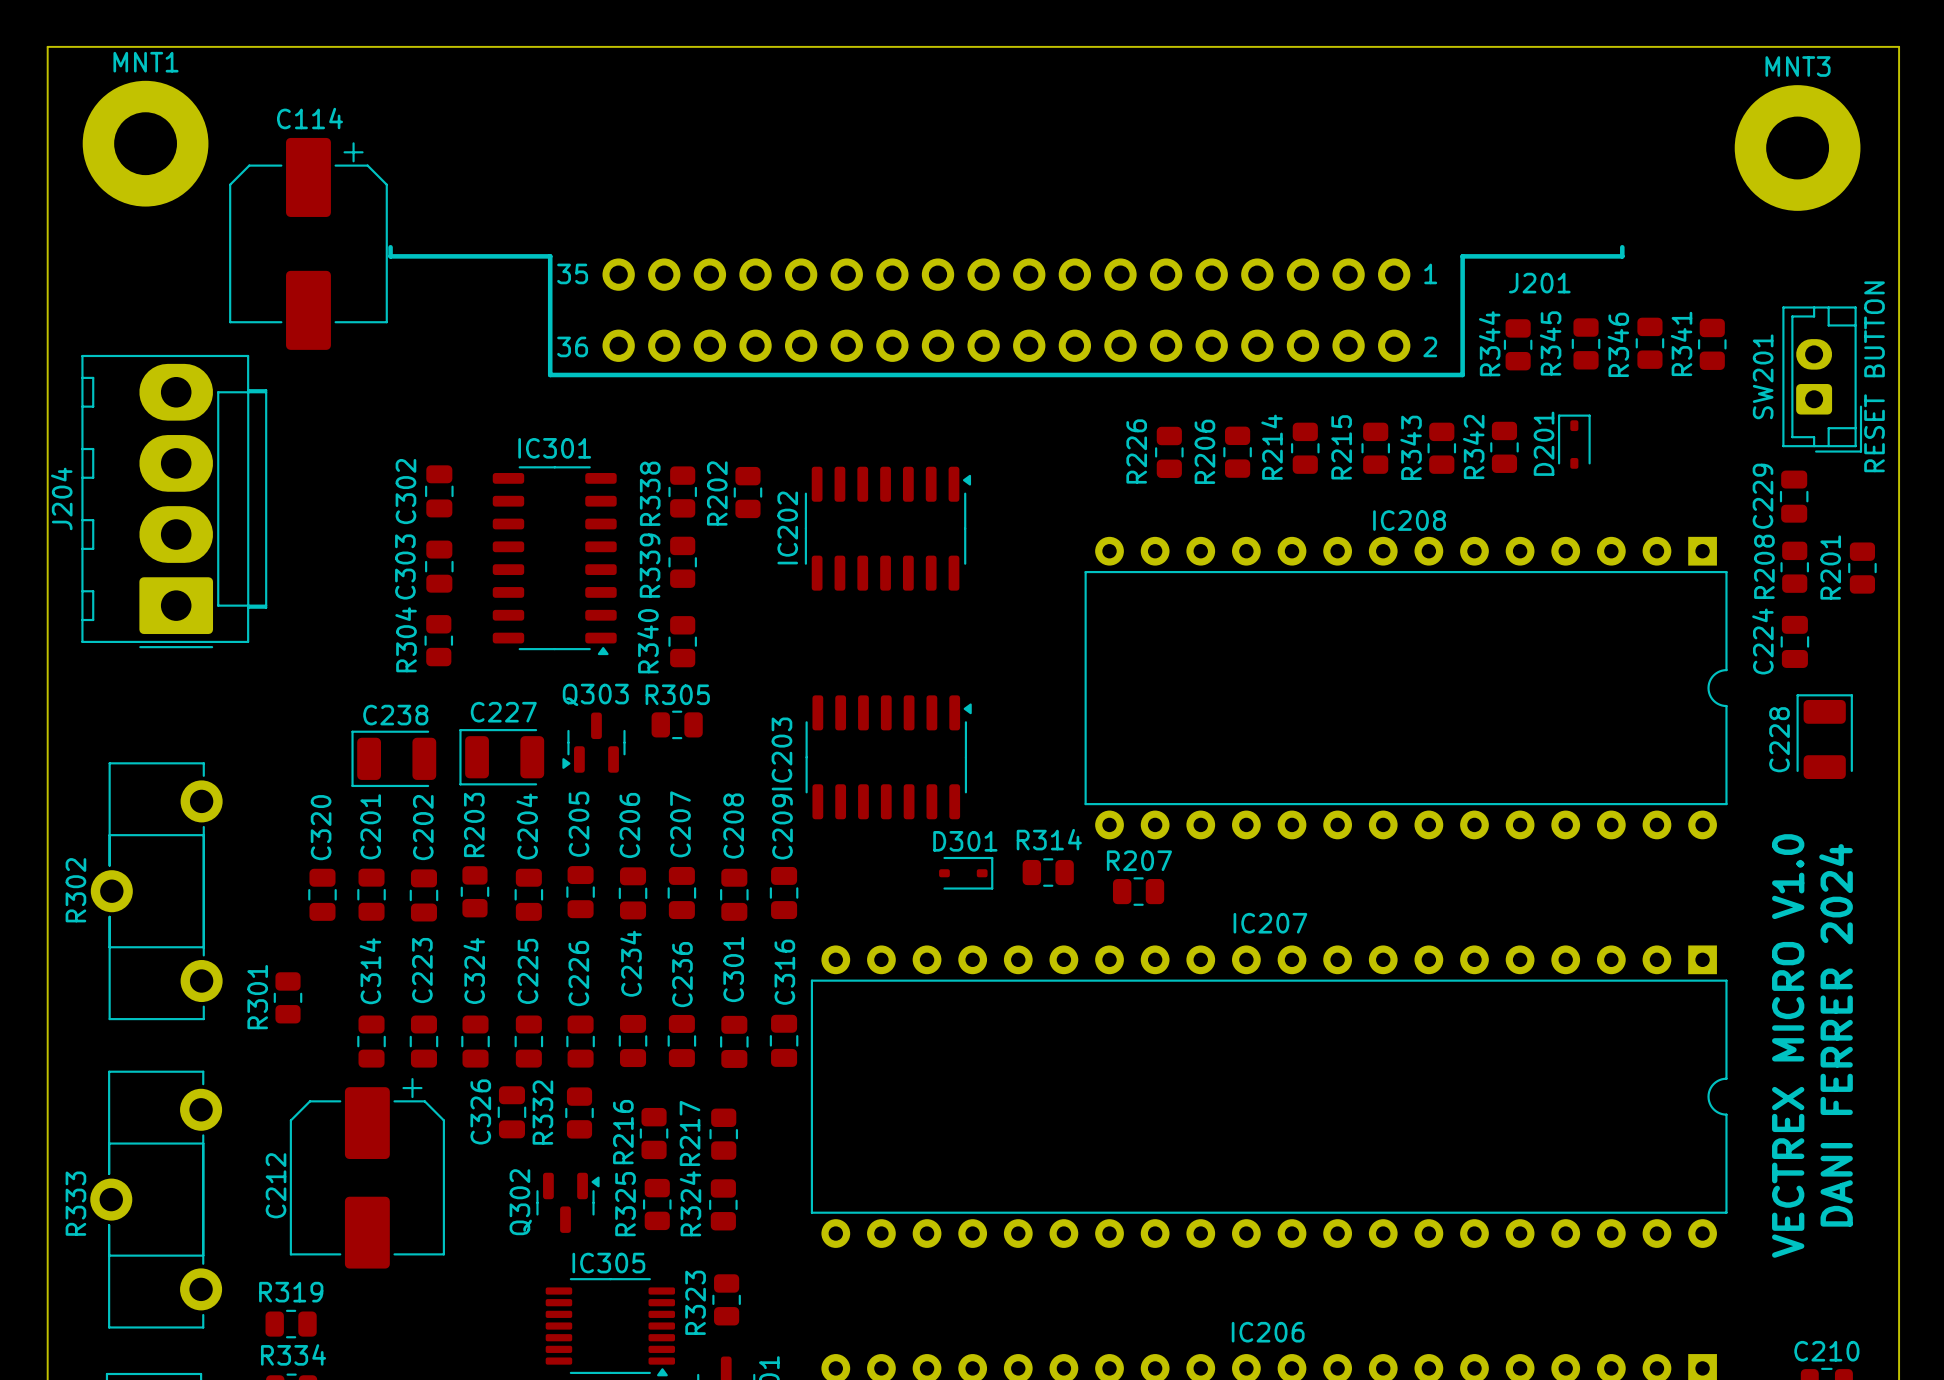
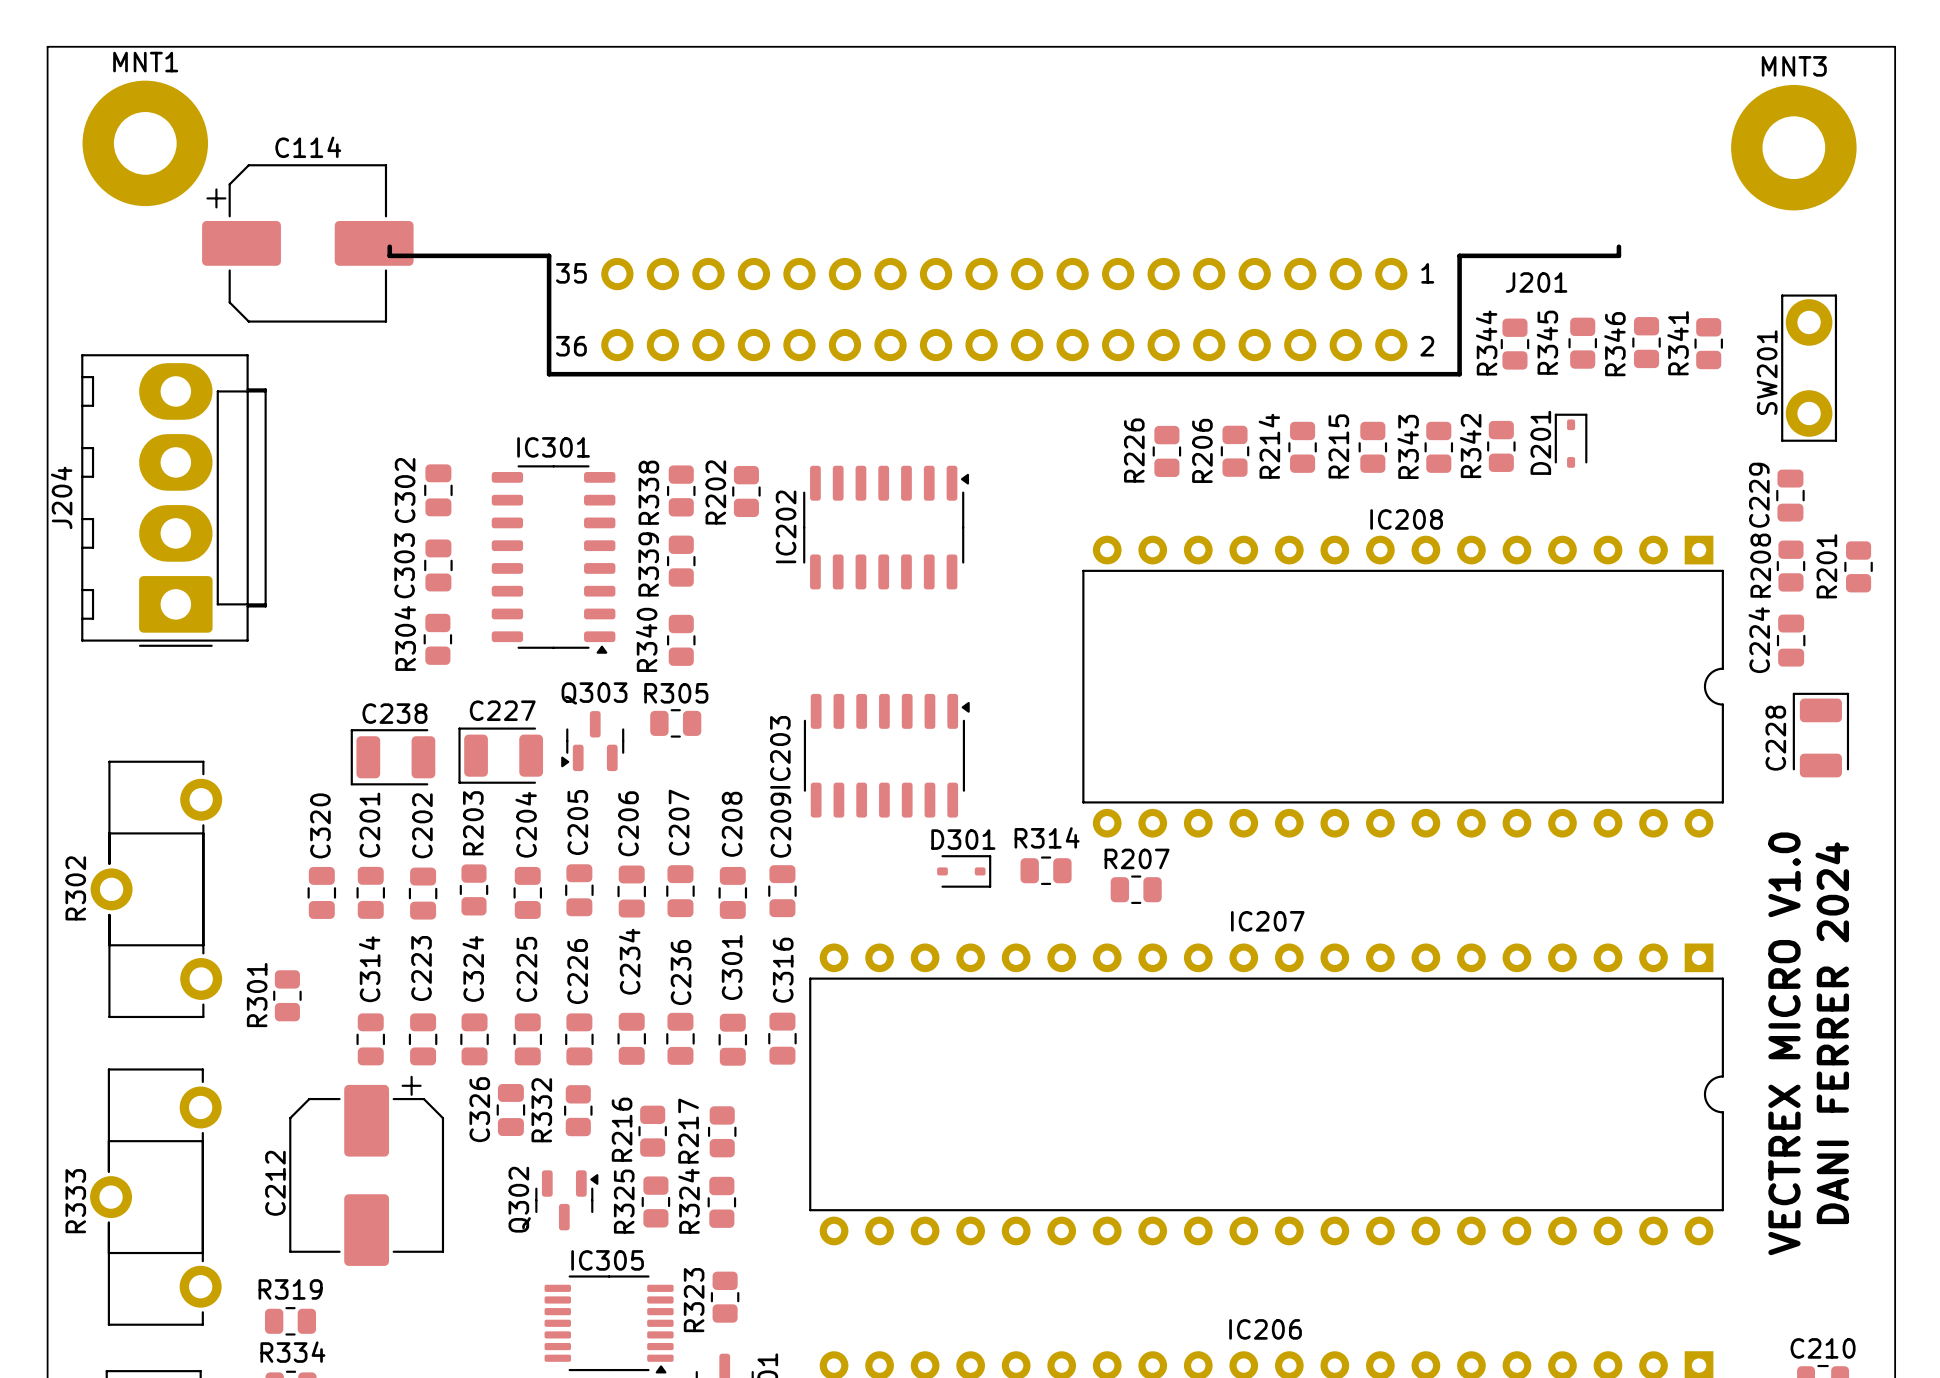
C114 rotation: 0° (308, 243) -> 90° counterclockwise (307, 243)
SW201 footprint: [1782, 306, 1863, 453] -> [1781, 294, 1838, 442]
SW201 value: RESET BUTTON (1874, 376) -> none

